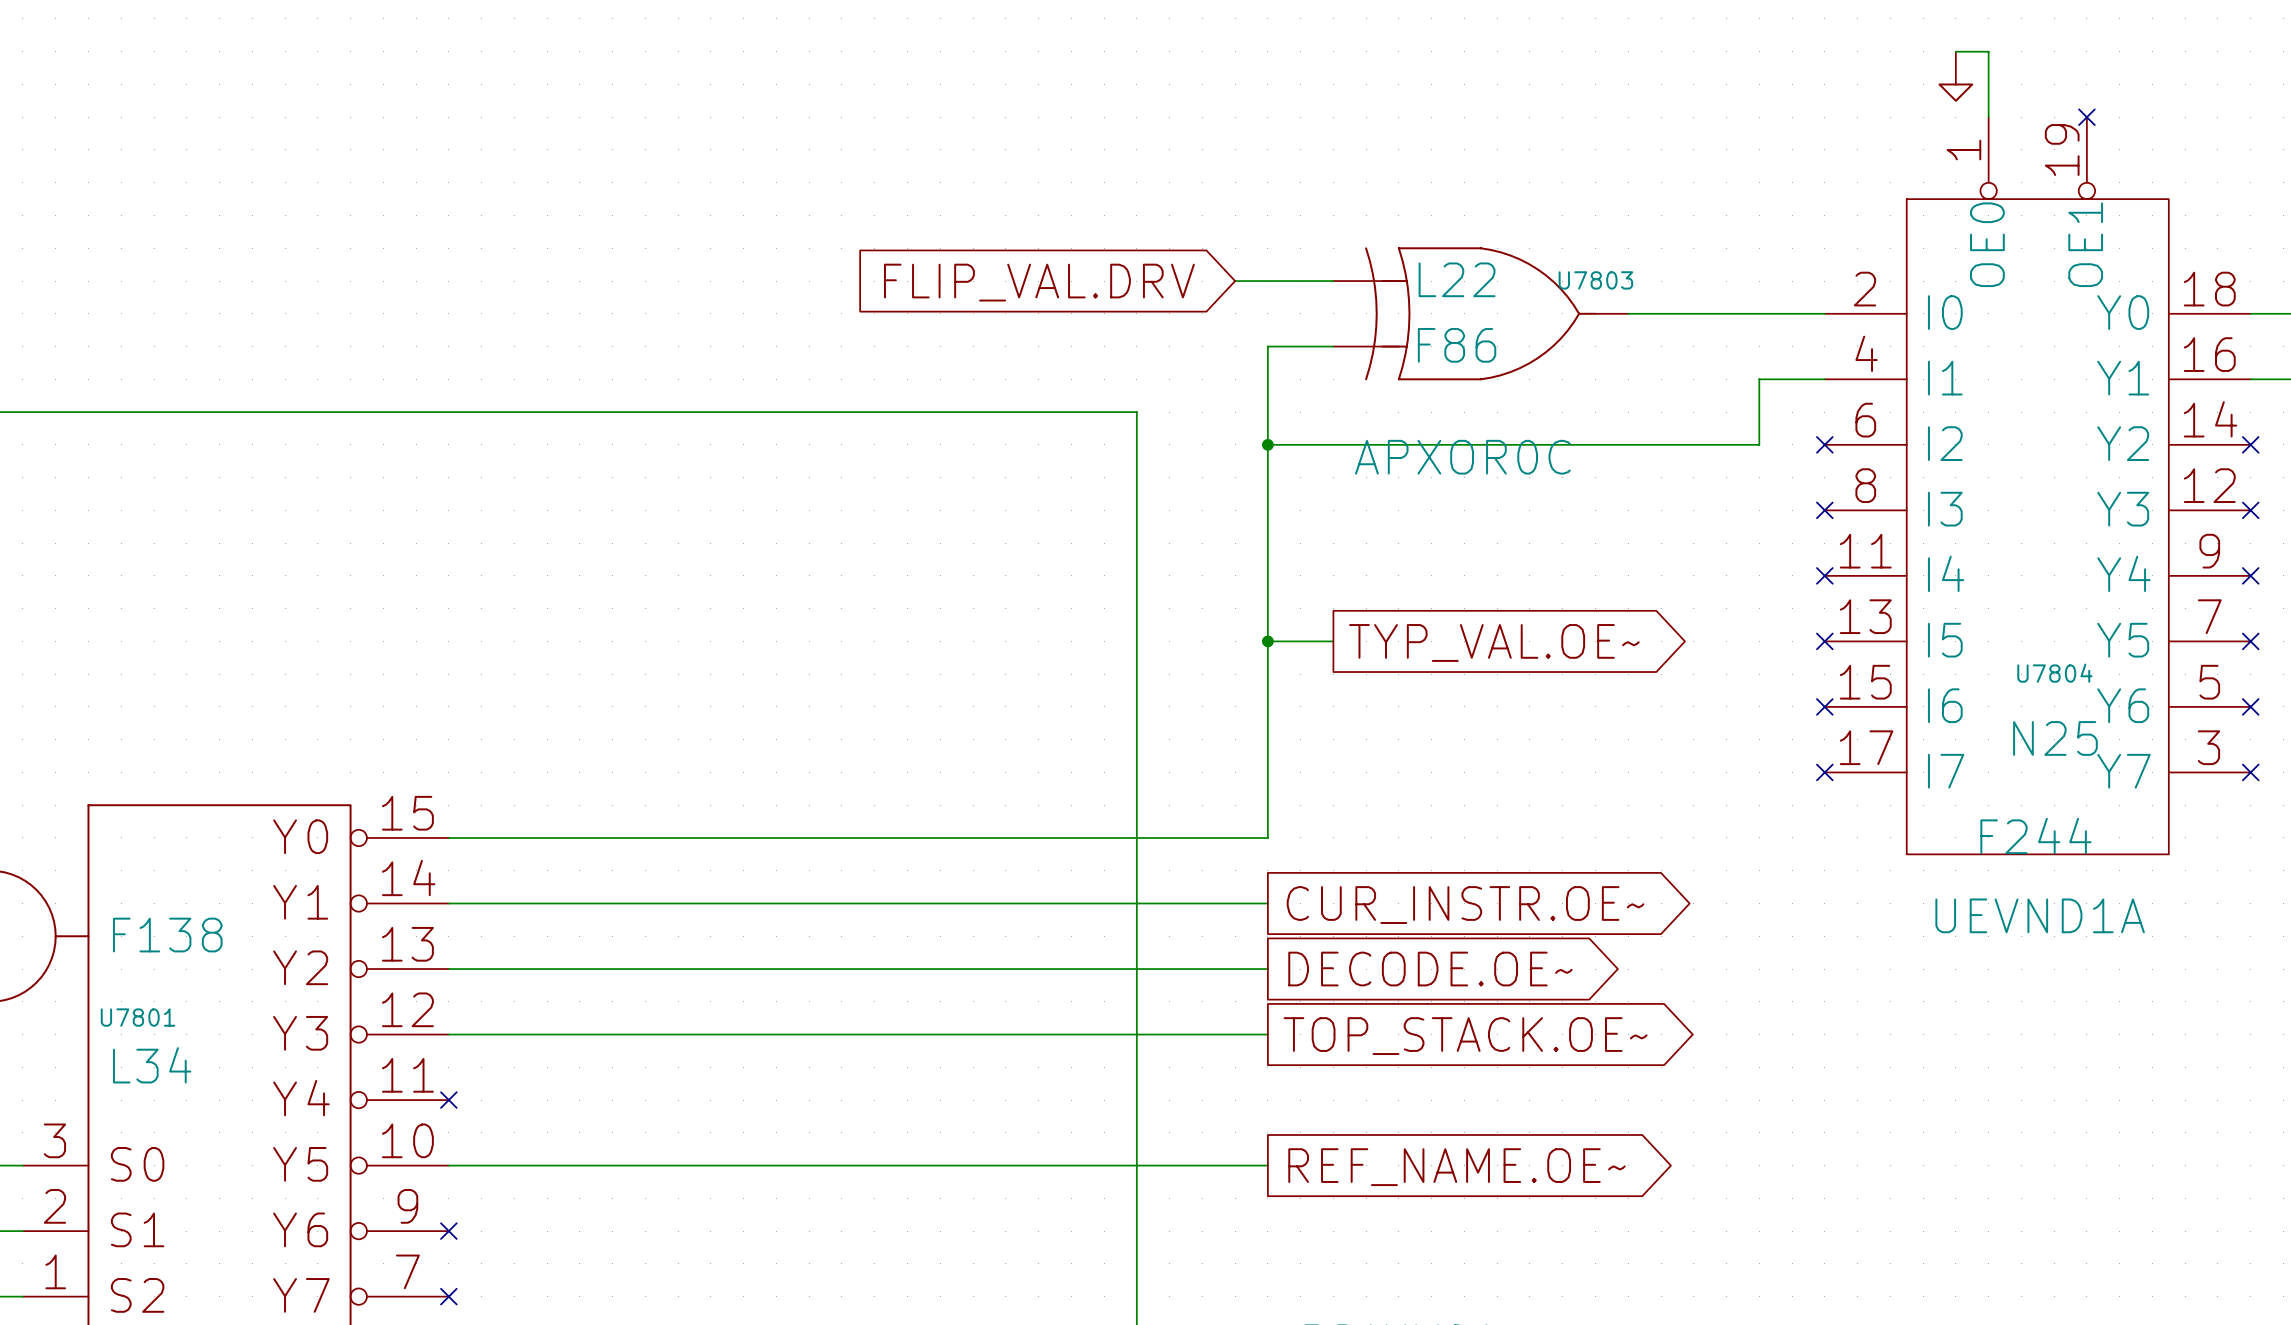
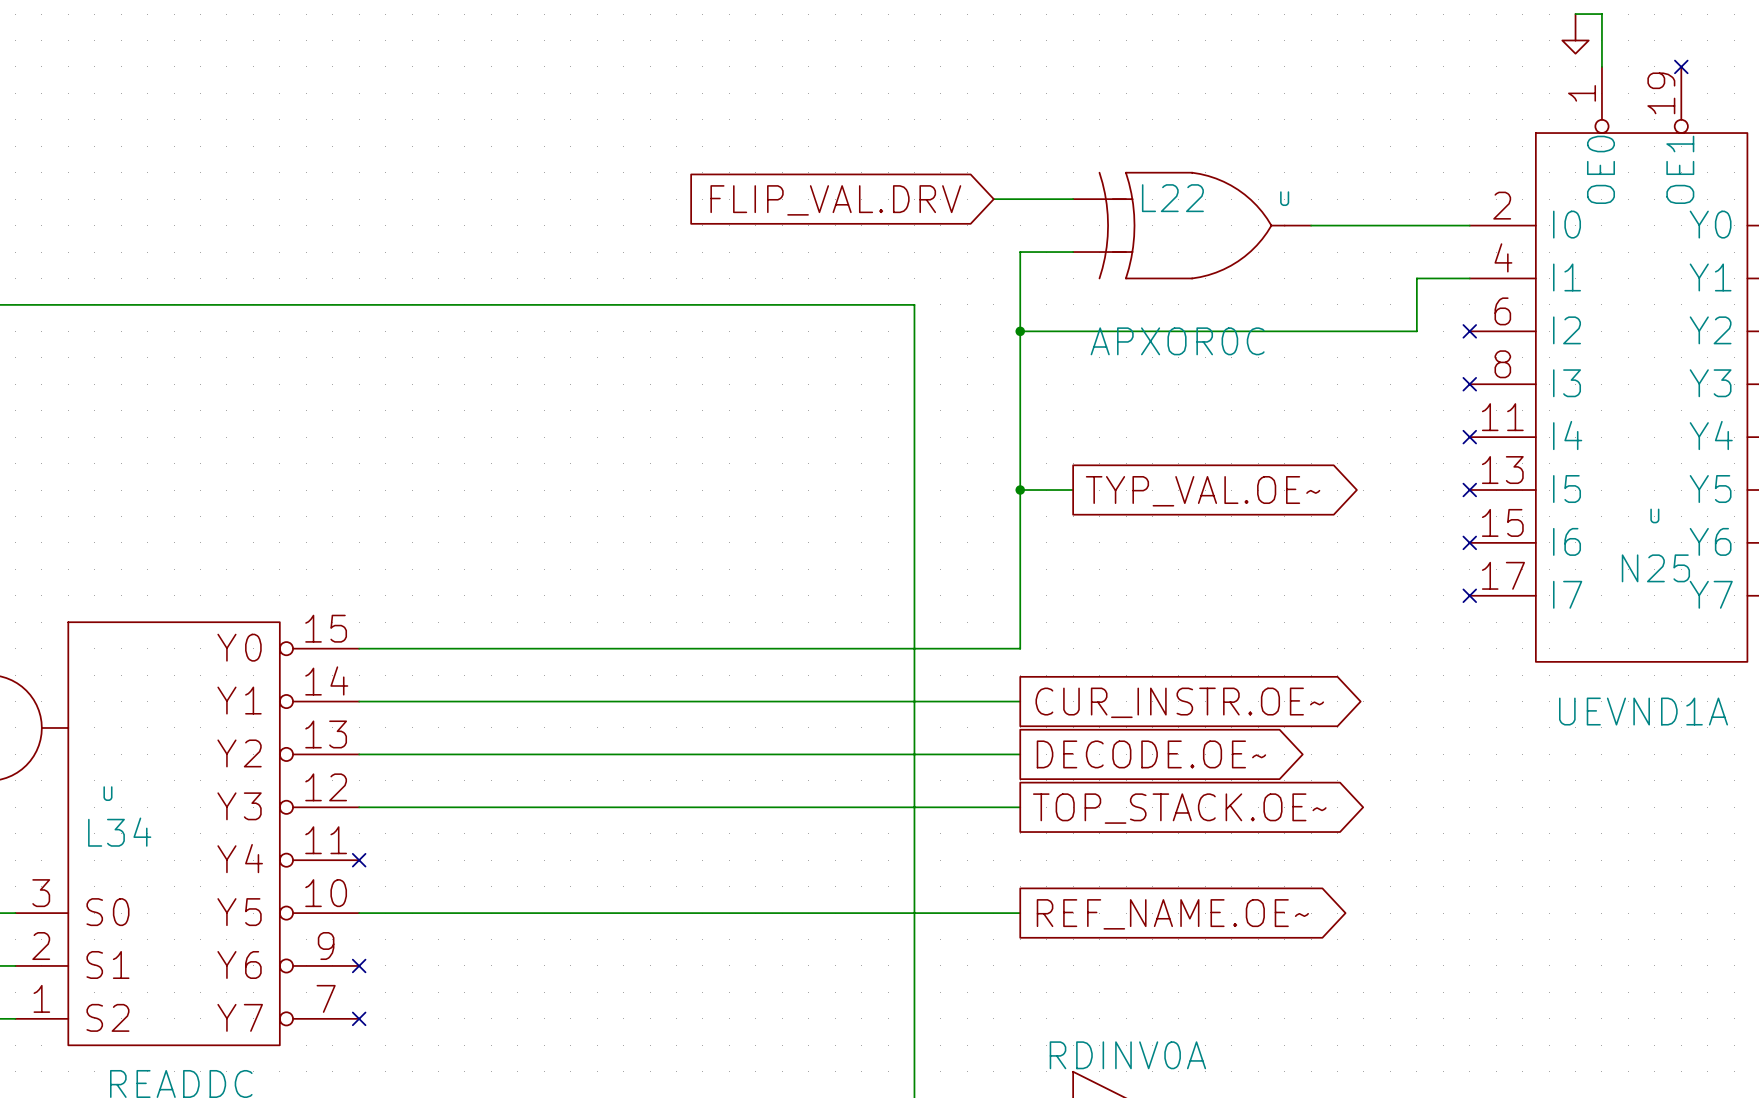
U7803 name: U7803 (1595, 280) -> U (1284, 198)
U7803 value: F86 (1457, 345) -> none
U7804 name: U7804 (2054, 673) -> U (1654, 515)
U7804 value: F244 (2035, 835) -> none
U7801 value: F138 (167, 935) -> none
U7801 name: U7801 (138, 1017) -> U (107, 793)

